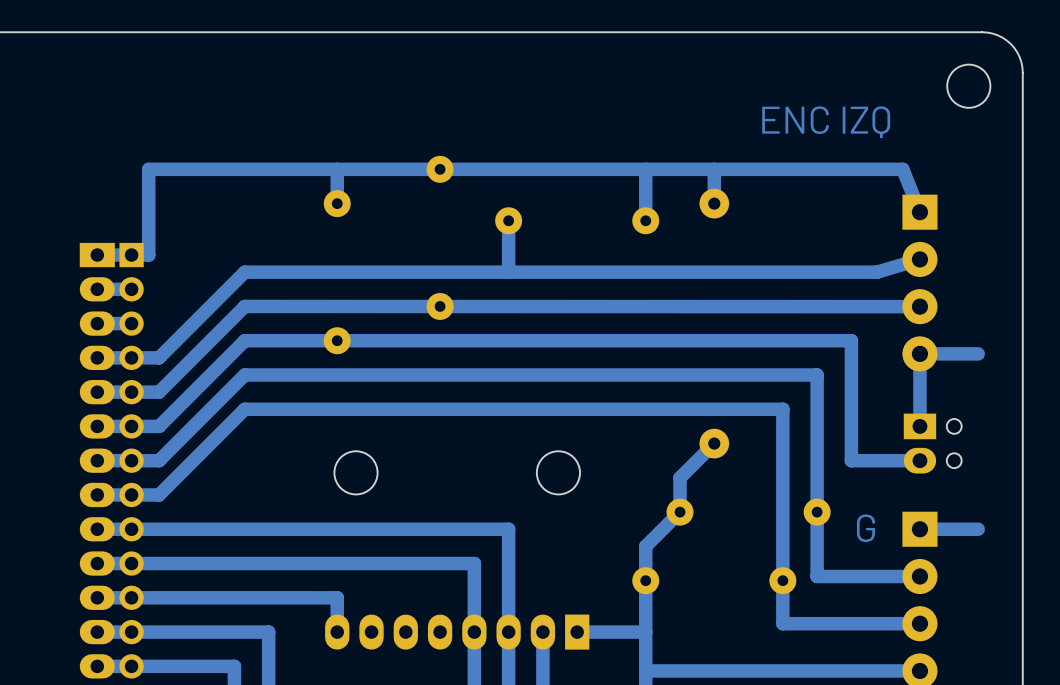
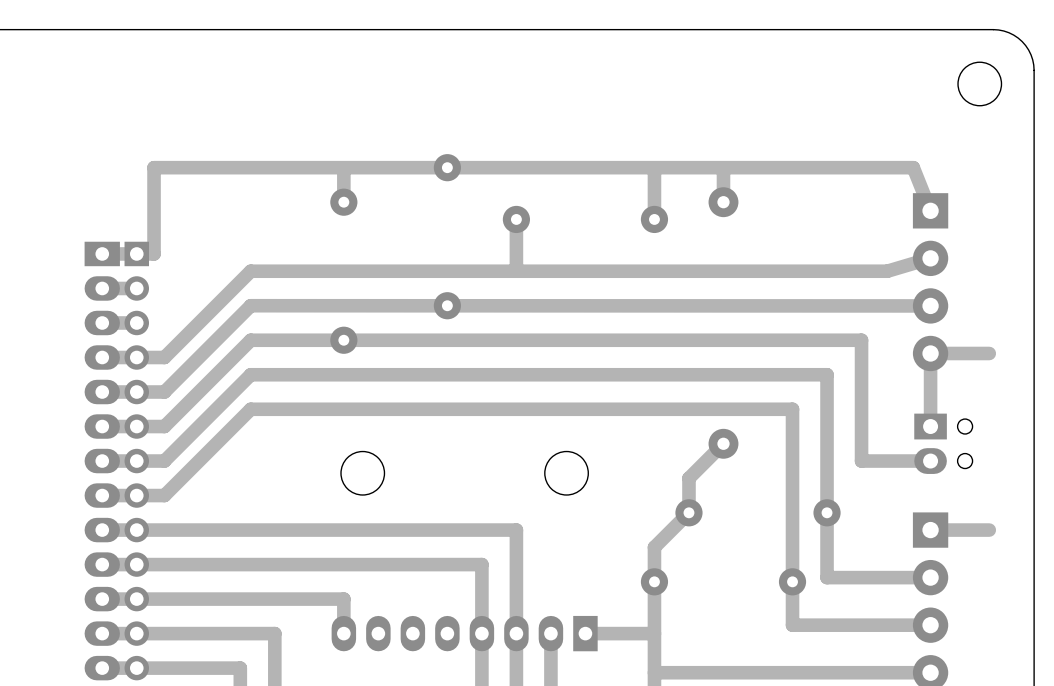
text: ENC IZQ (826, 122) -> none
text: G (865, 528) -> none

